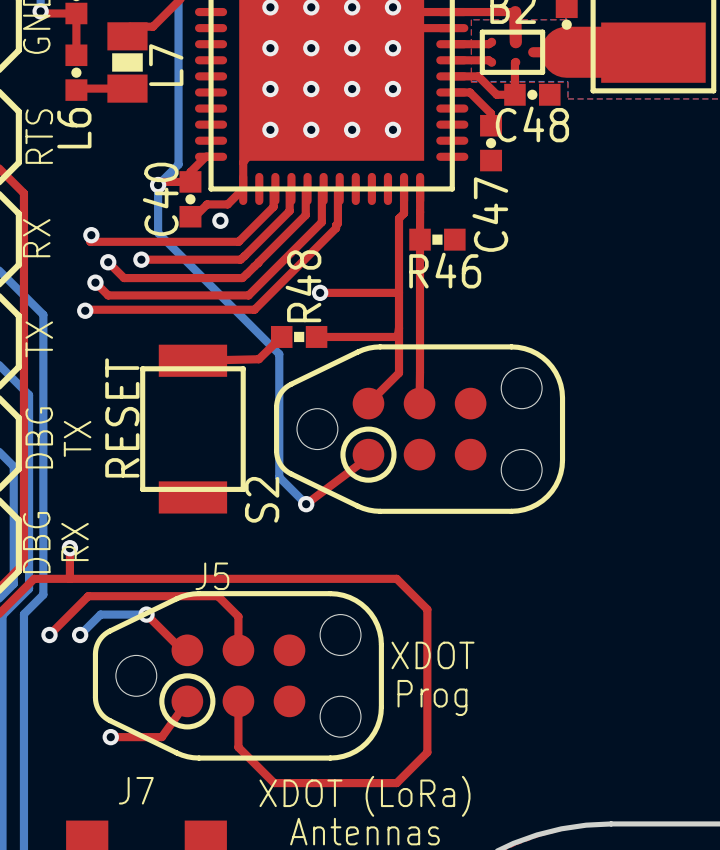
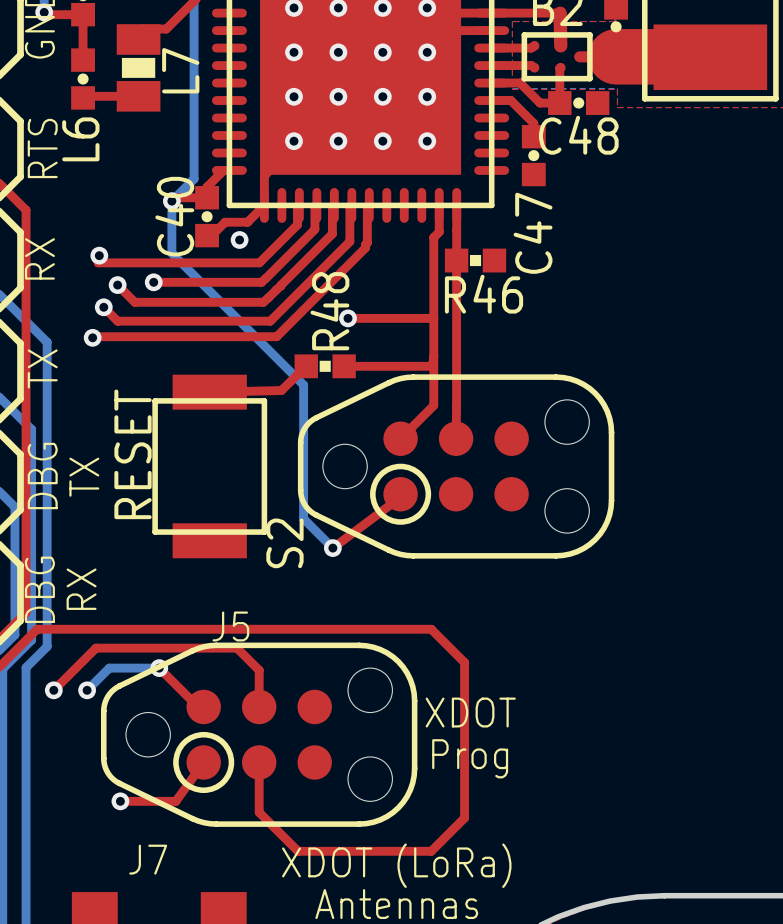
top track: (69, 548) (69, 578) -> none
via: (69, 548) -> none

